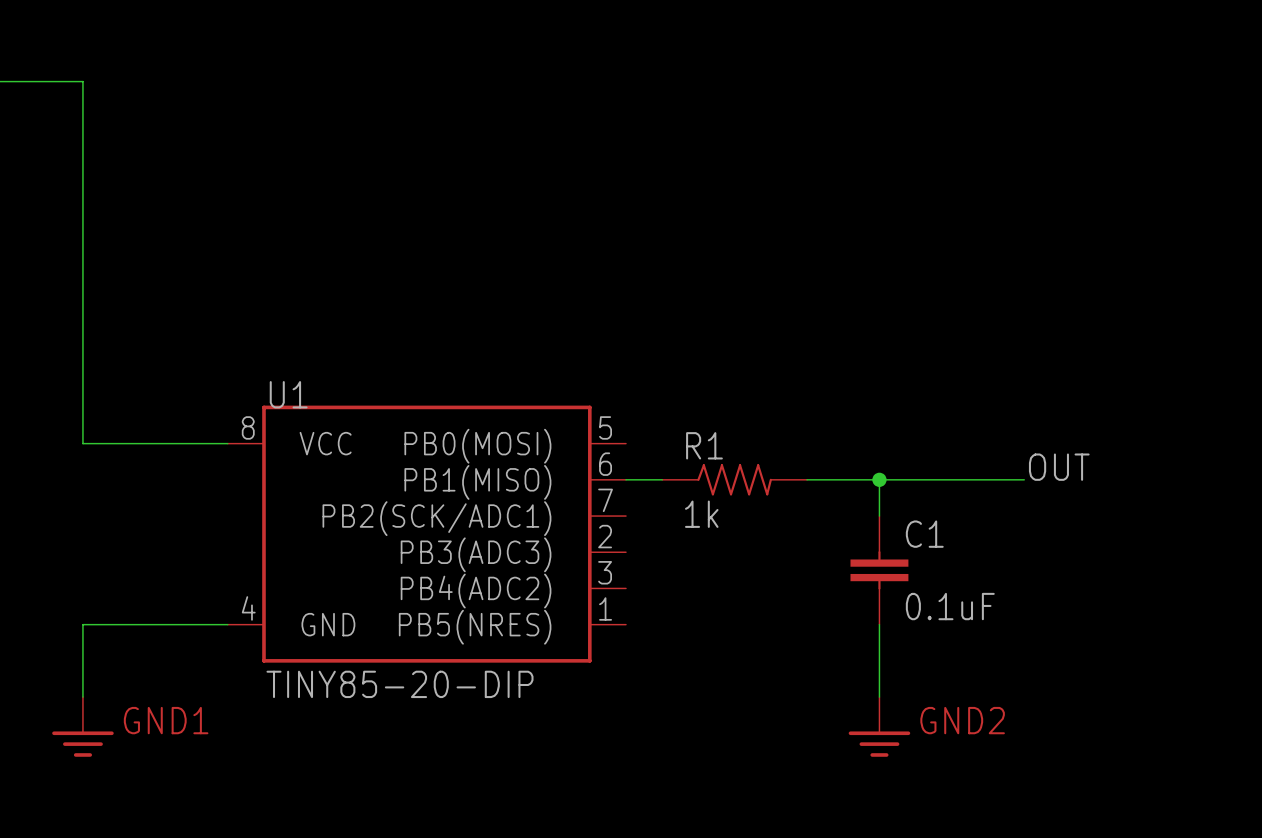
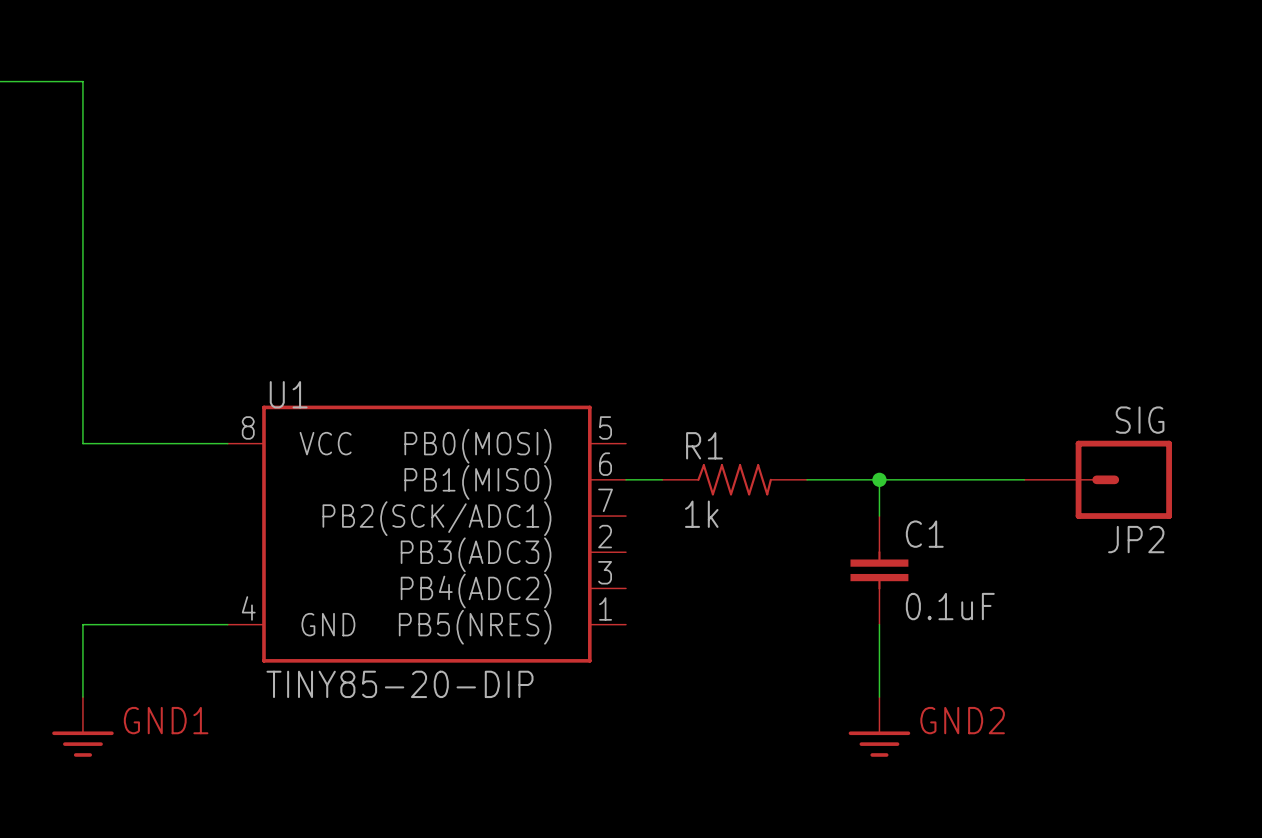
label: OUT (1059, 467) -> none
JP2: none -> SIG (1098, 479)

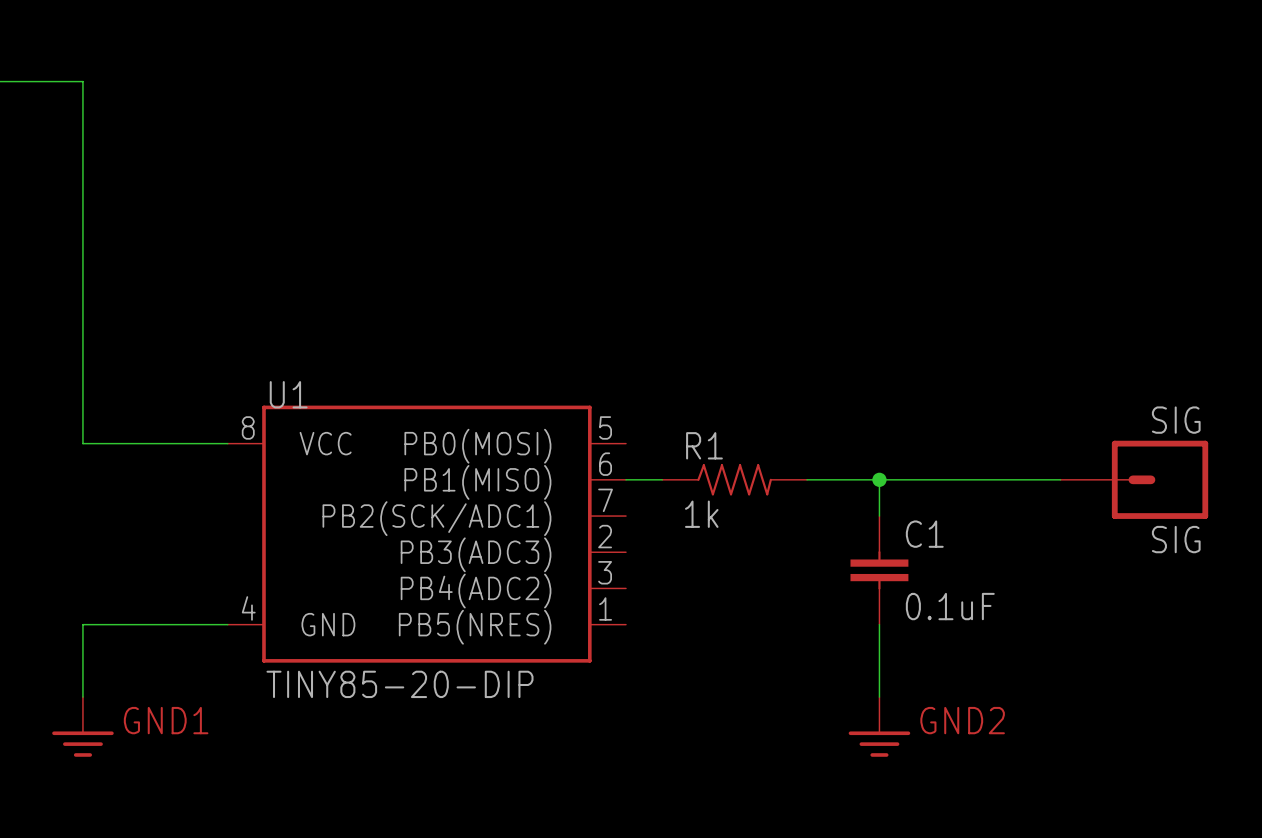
JP2: SIG (1098, 479) -> none
SIG: none -> SIG (1134, 479)

